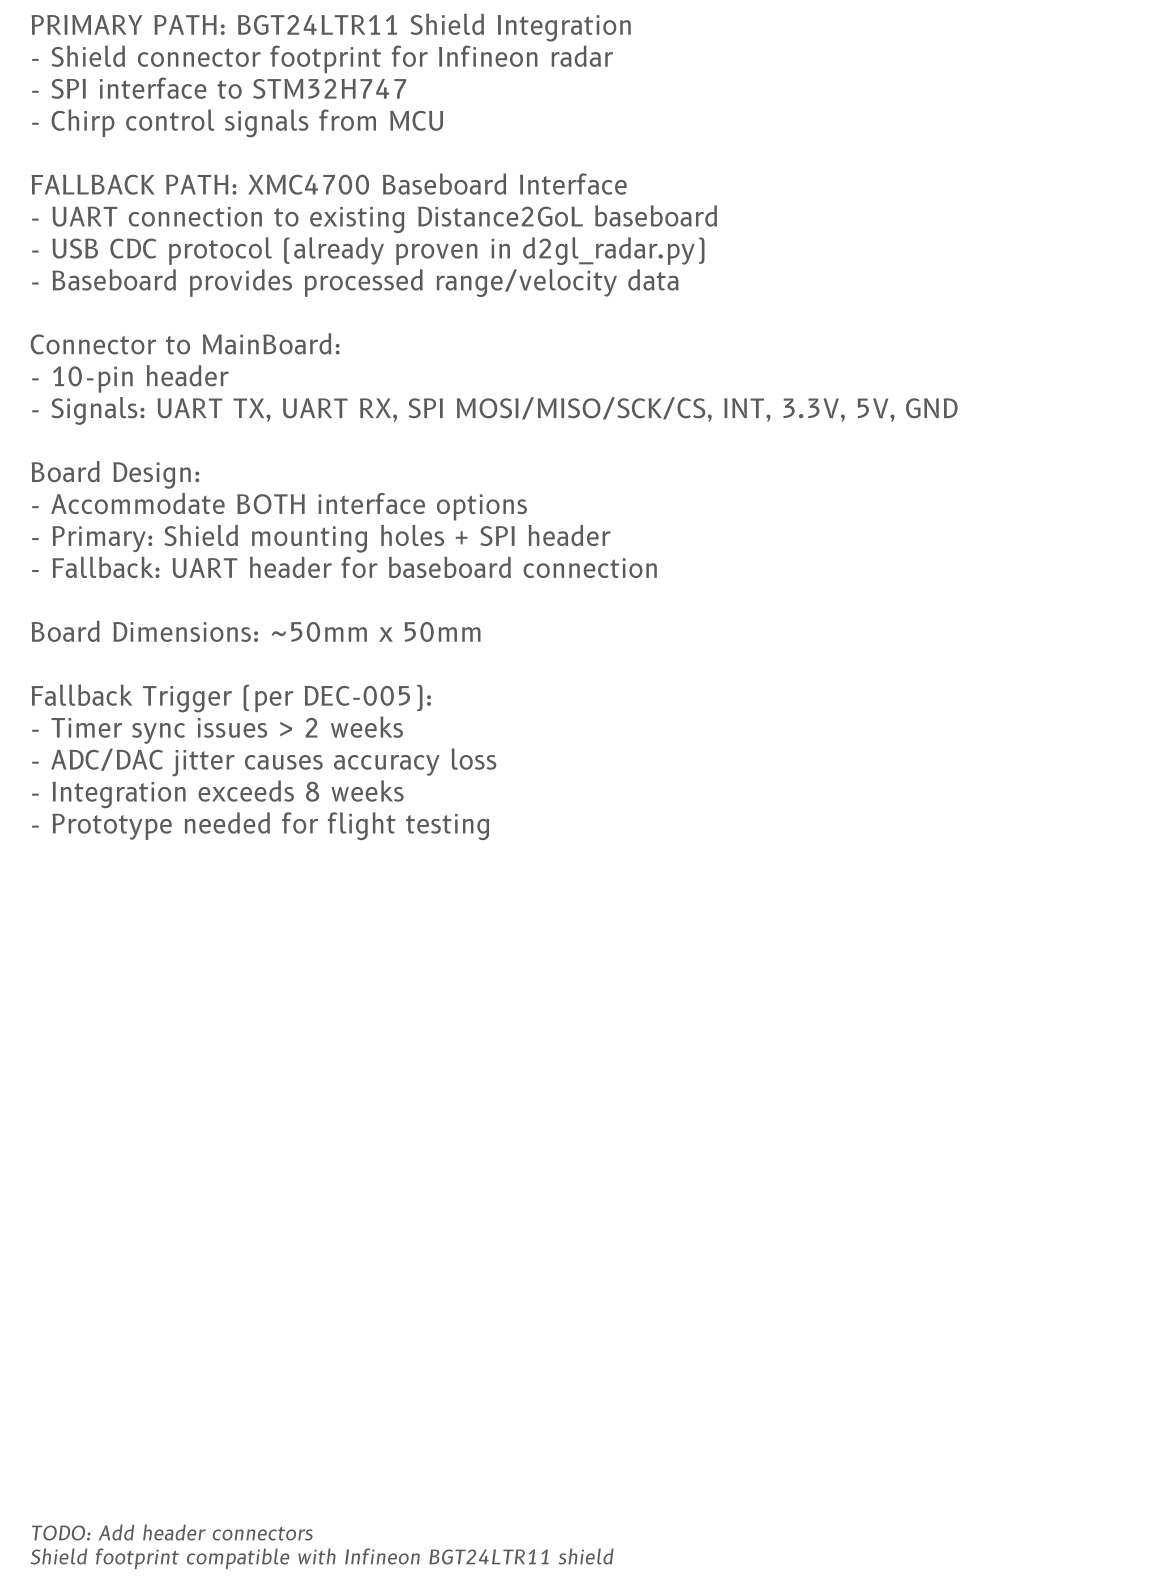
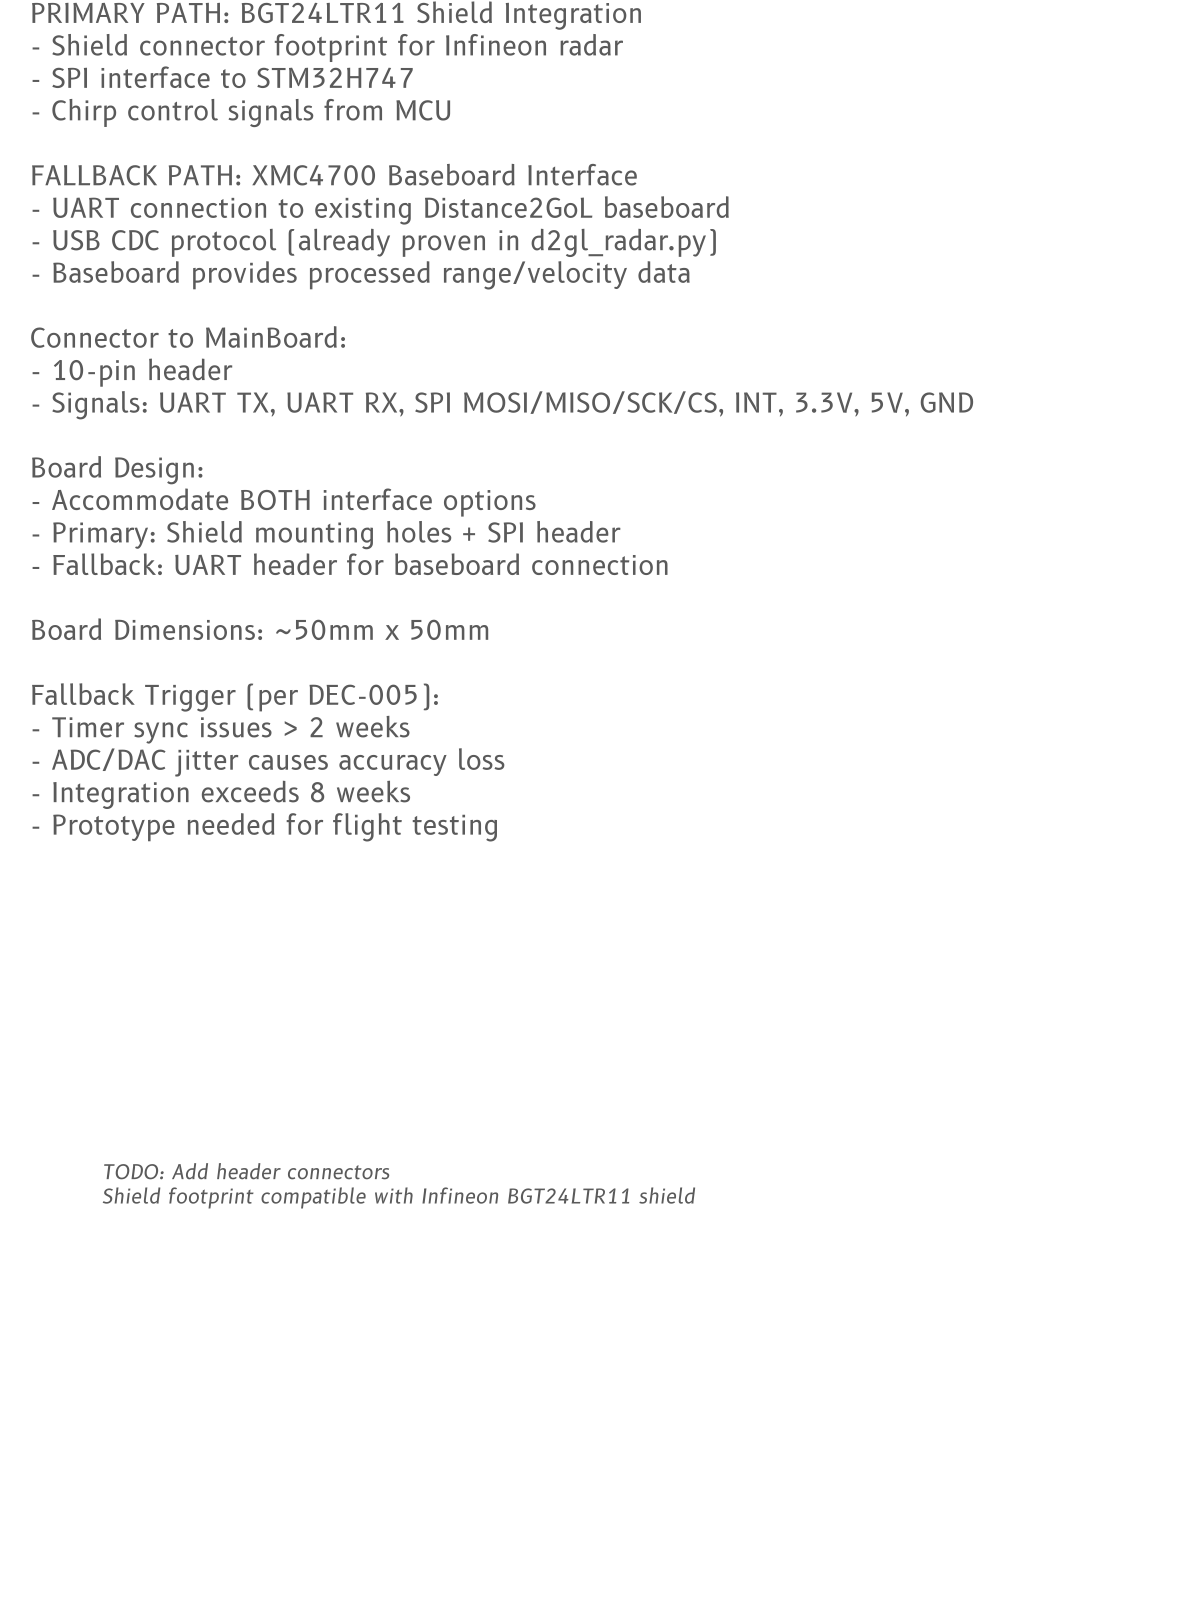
text: none -> TODO: Add header connectors (246, 1171)
text: none -> Shield footprint compatible with Infineon BGT24LTR11 shield (398, 1197)
text: TODO: Add header connectors (172, 1532) -> none
text: Shield footprint compatible with Infineon BGT24LTR11 shield (322, 1558) -> none

